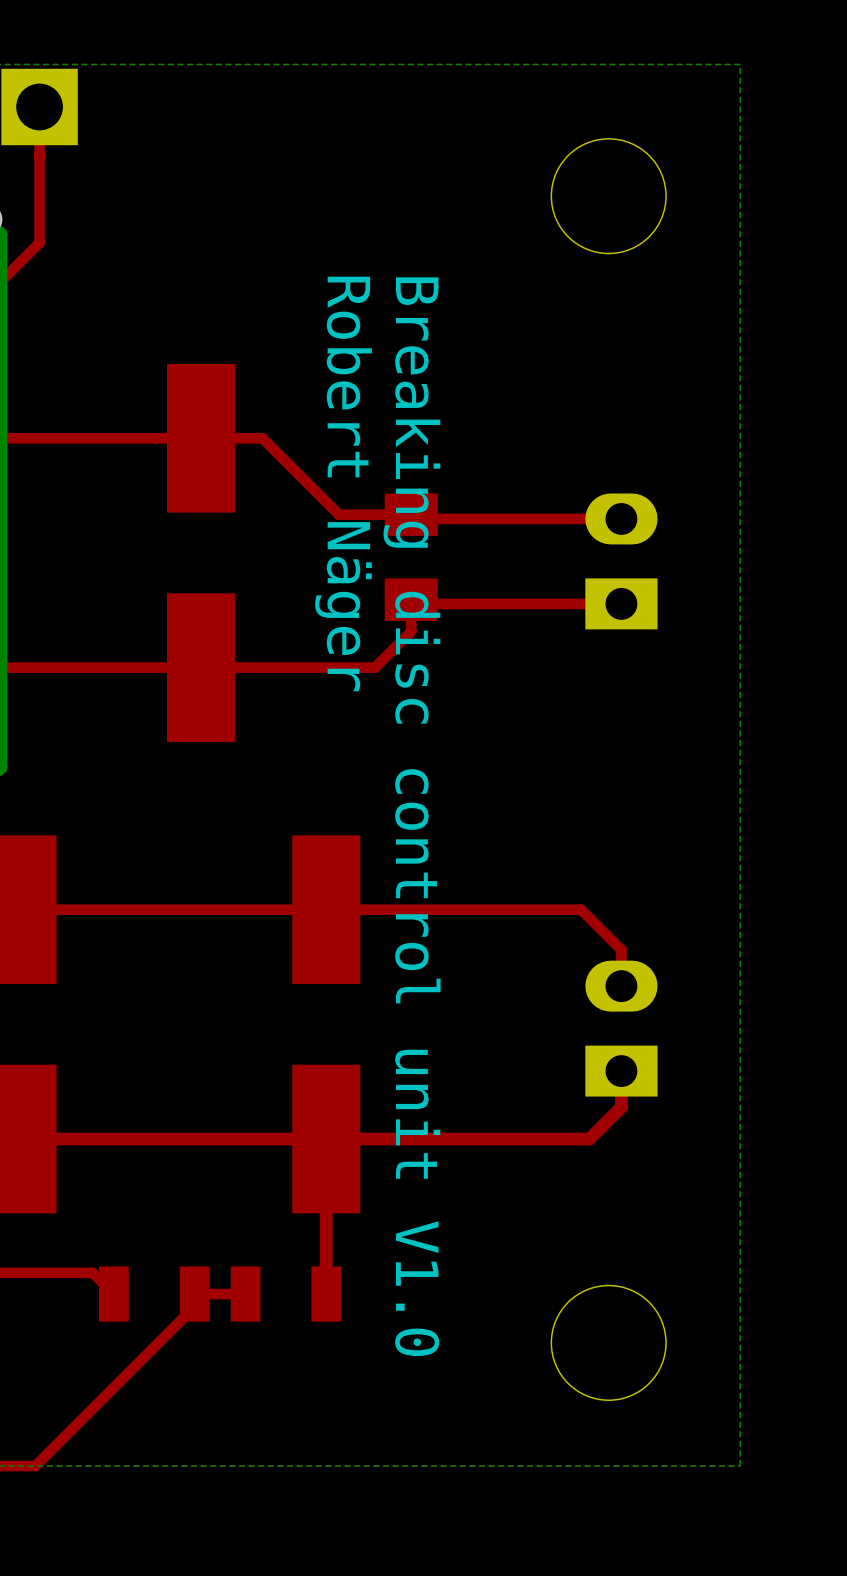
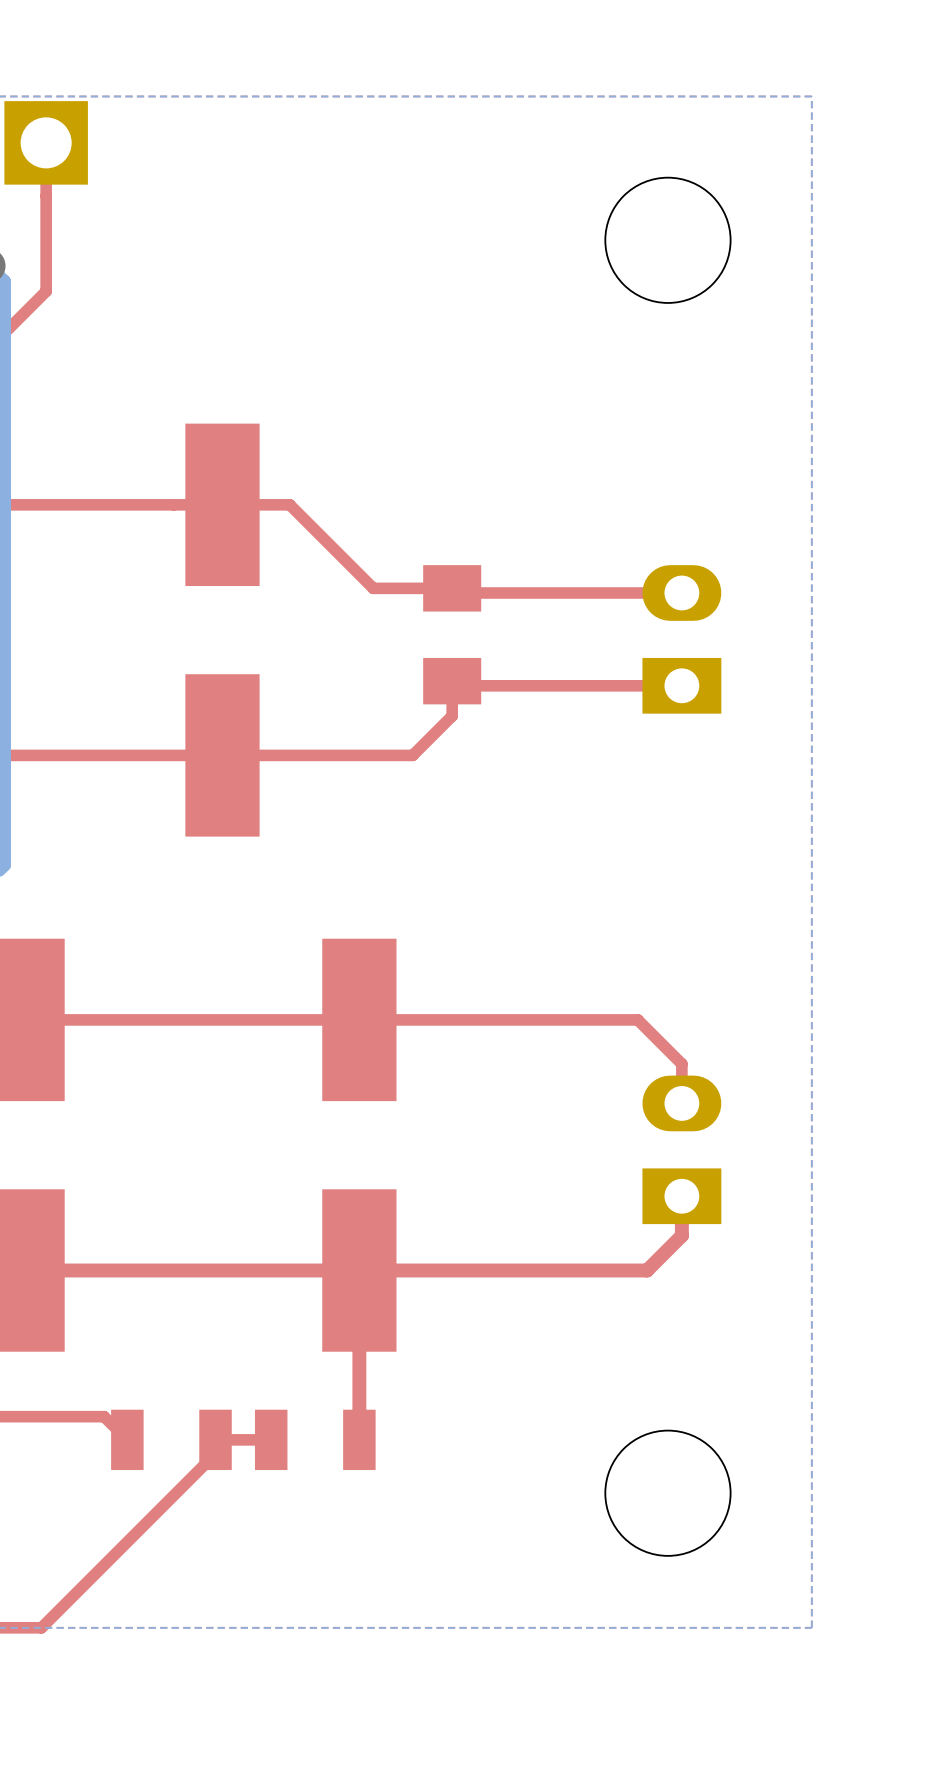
text: Robert Näger (343, 483) -> none
text: Breaking disc control unit V1.0 (412, 816) -> none

